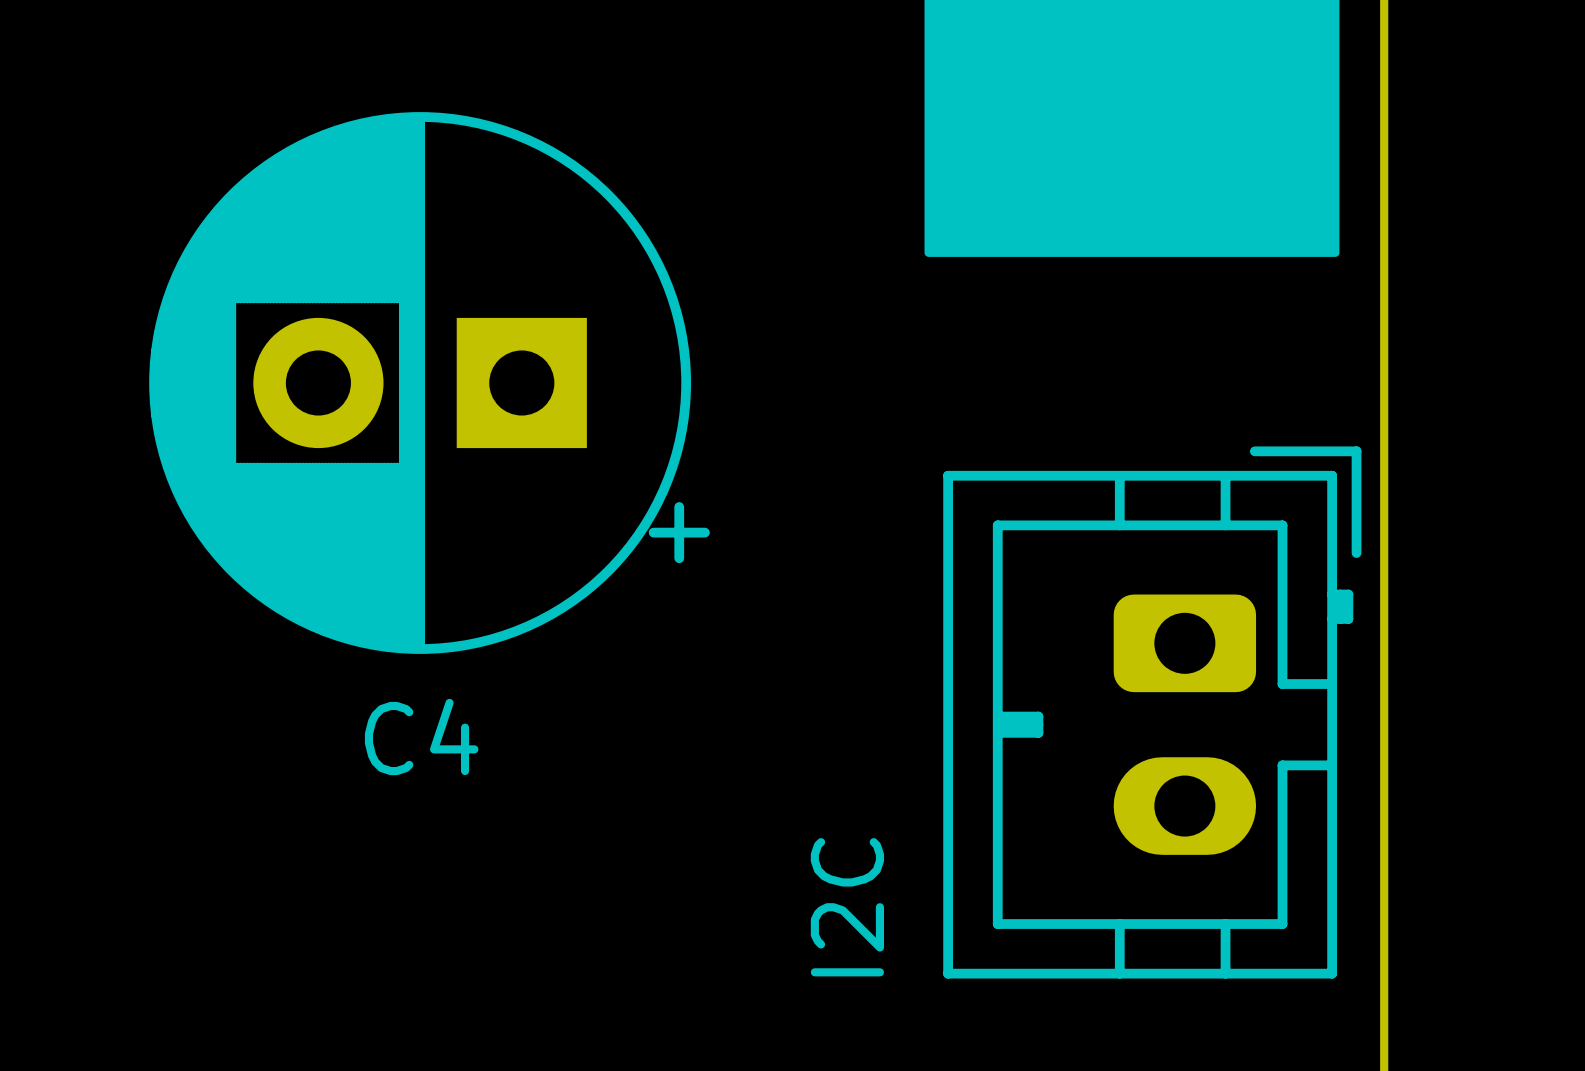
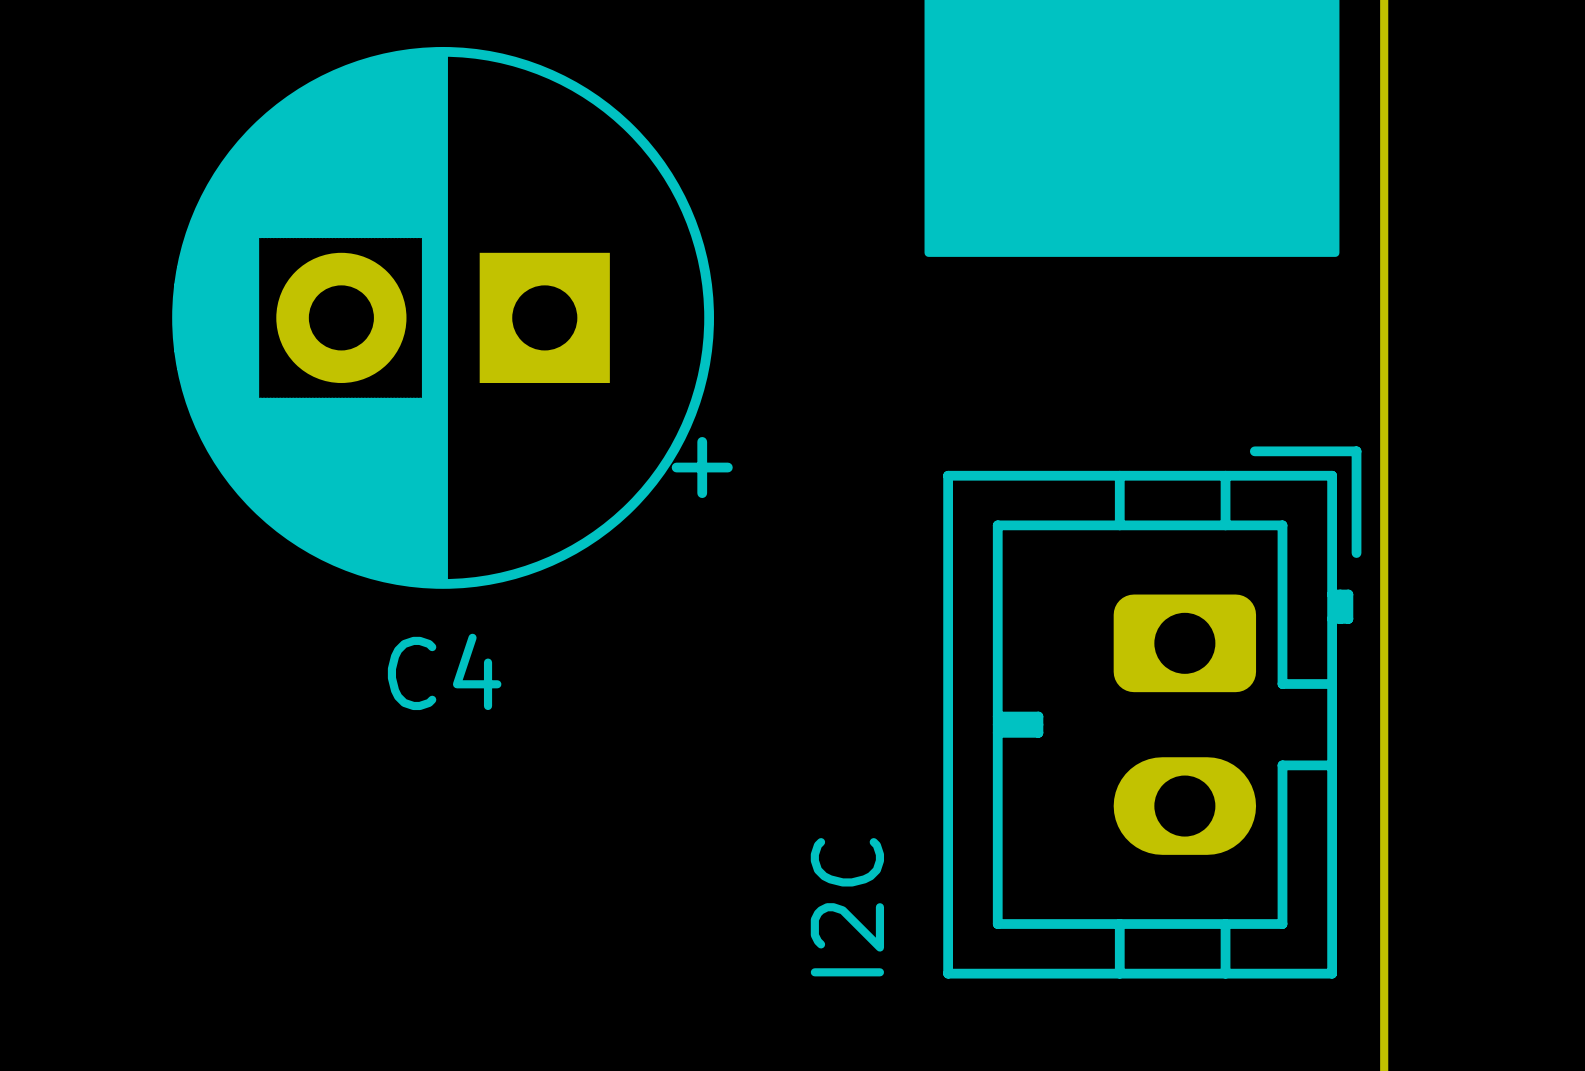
C4 position: (429, 382) -> (452, 317)

